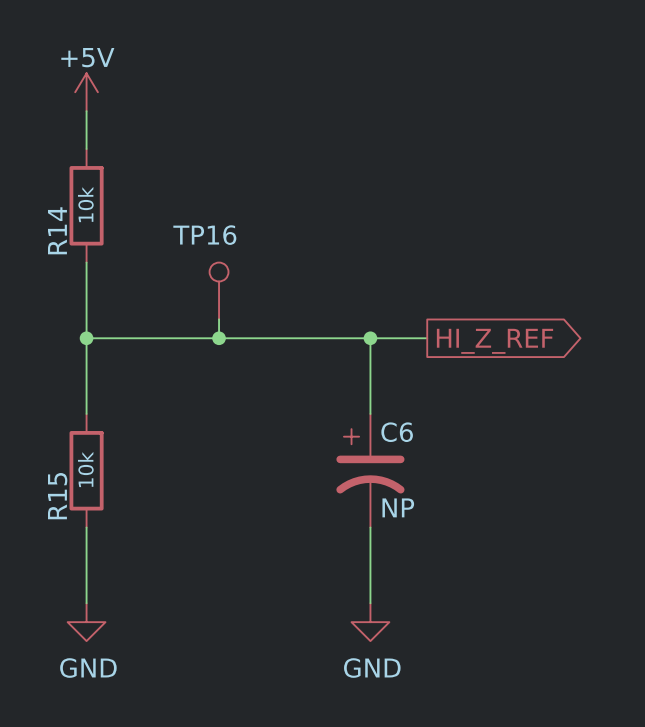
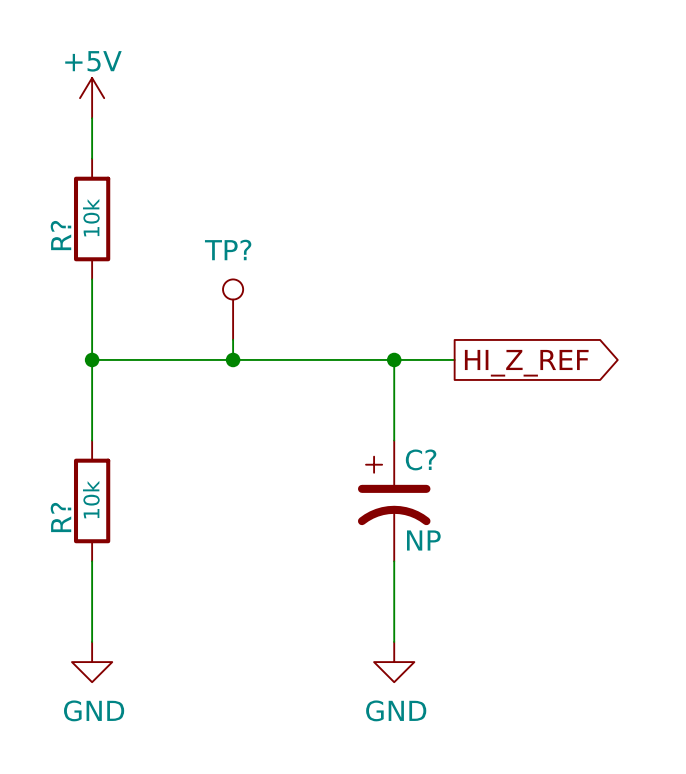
R14 name: R14 (57, 230) -> R? (60, 235)
TP16 name: TP16 (204, 235) -> TP? (228, 249)
C6 name: C6 (397, 432) -> C? (421, 459)
R15 name: R15 (57, 496) -> R? (60, 517)

